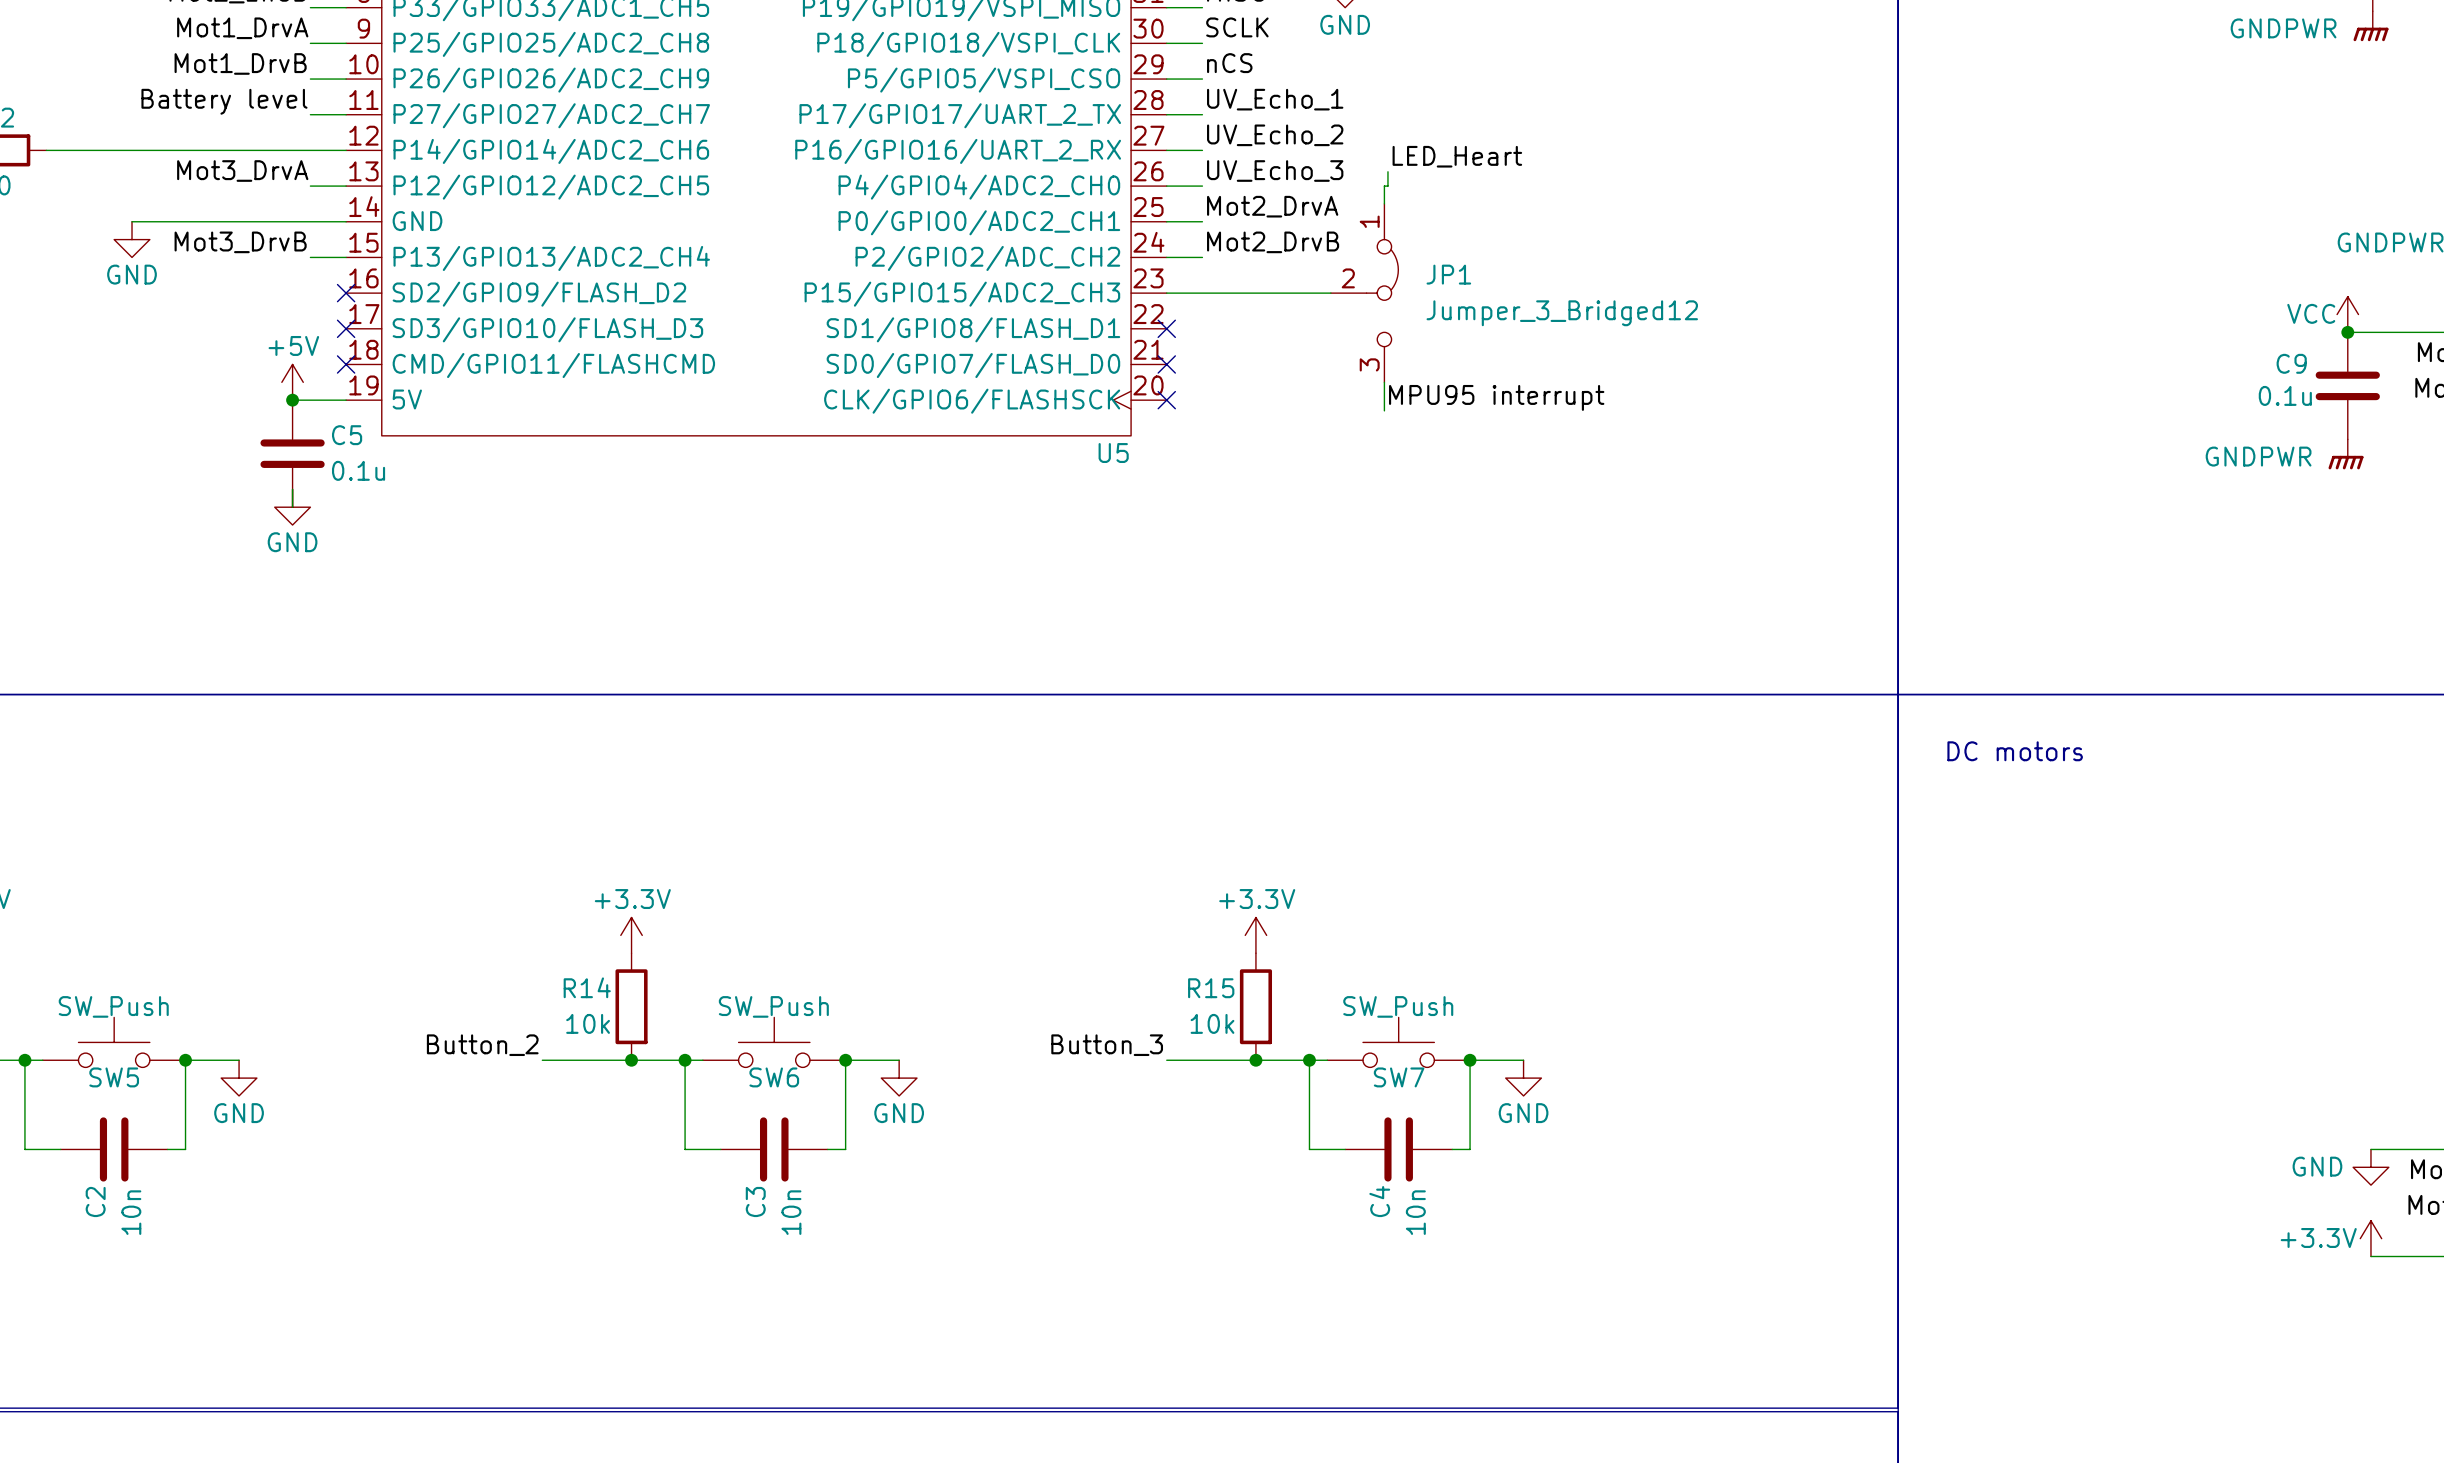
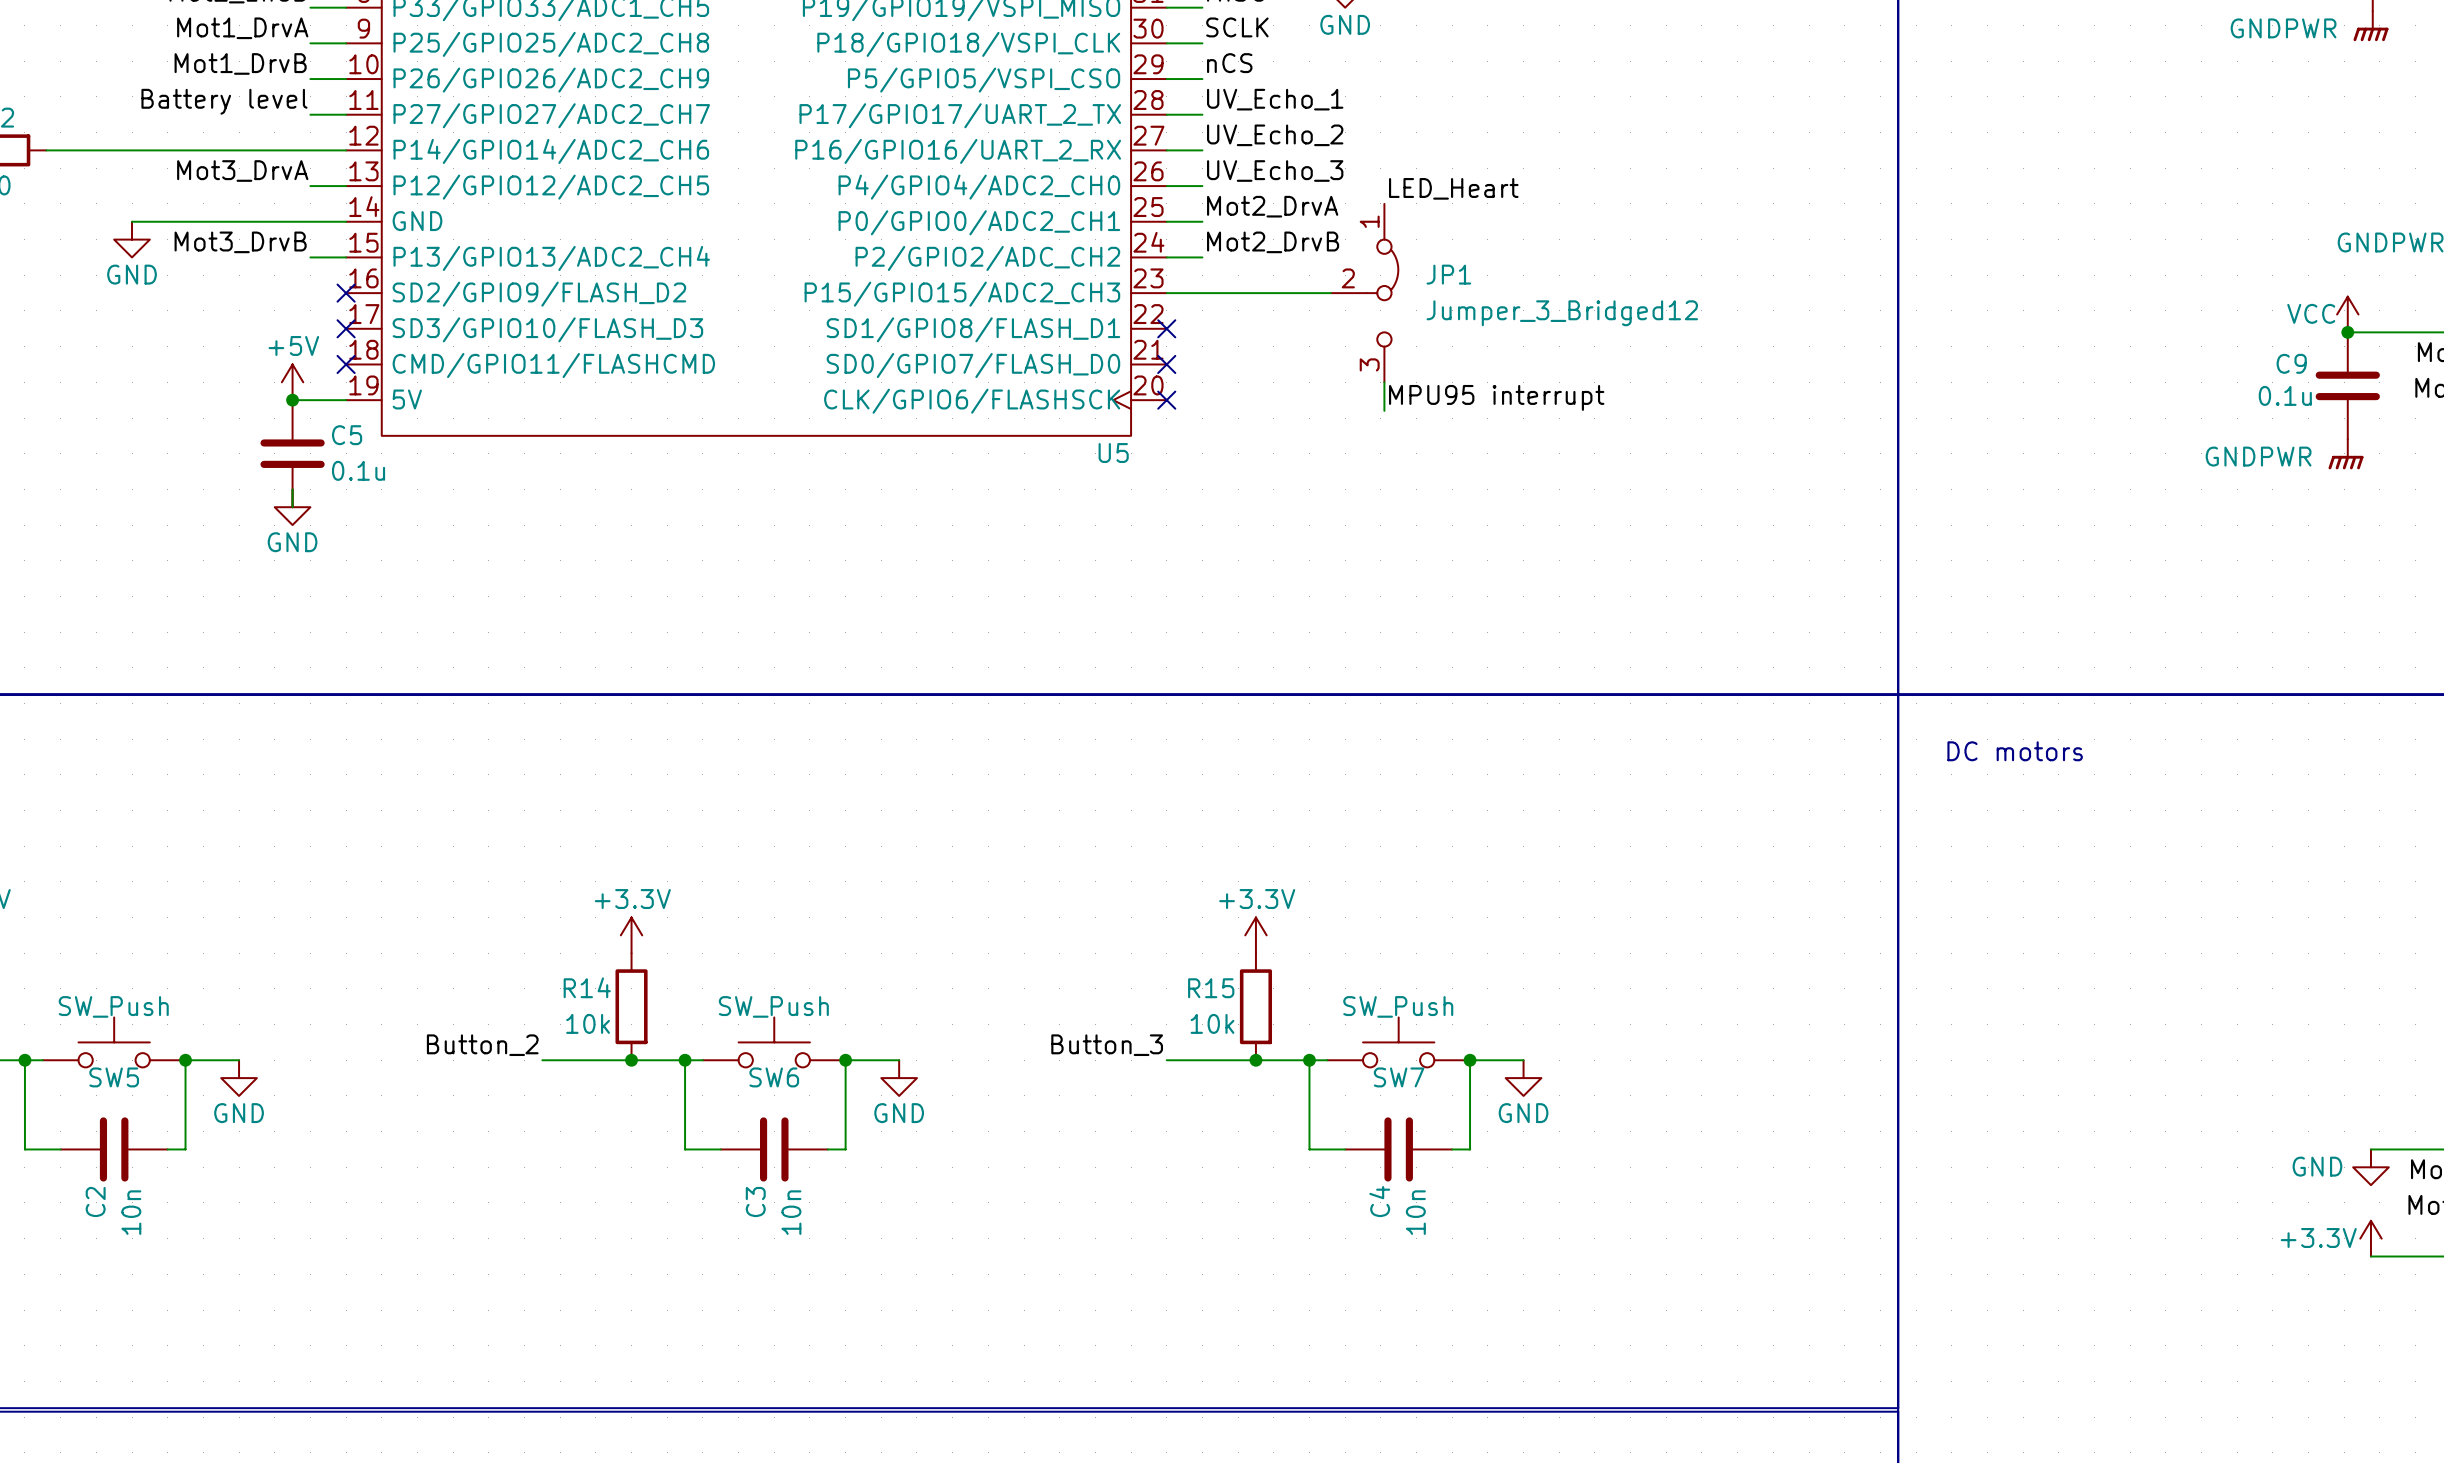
label position: LED_Heart (1457, 156) -> LED_Heart (1453, 188)
wire: (1387, 171) (1387, 186) (1384, 186) (1384, 203) -> none

